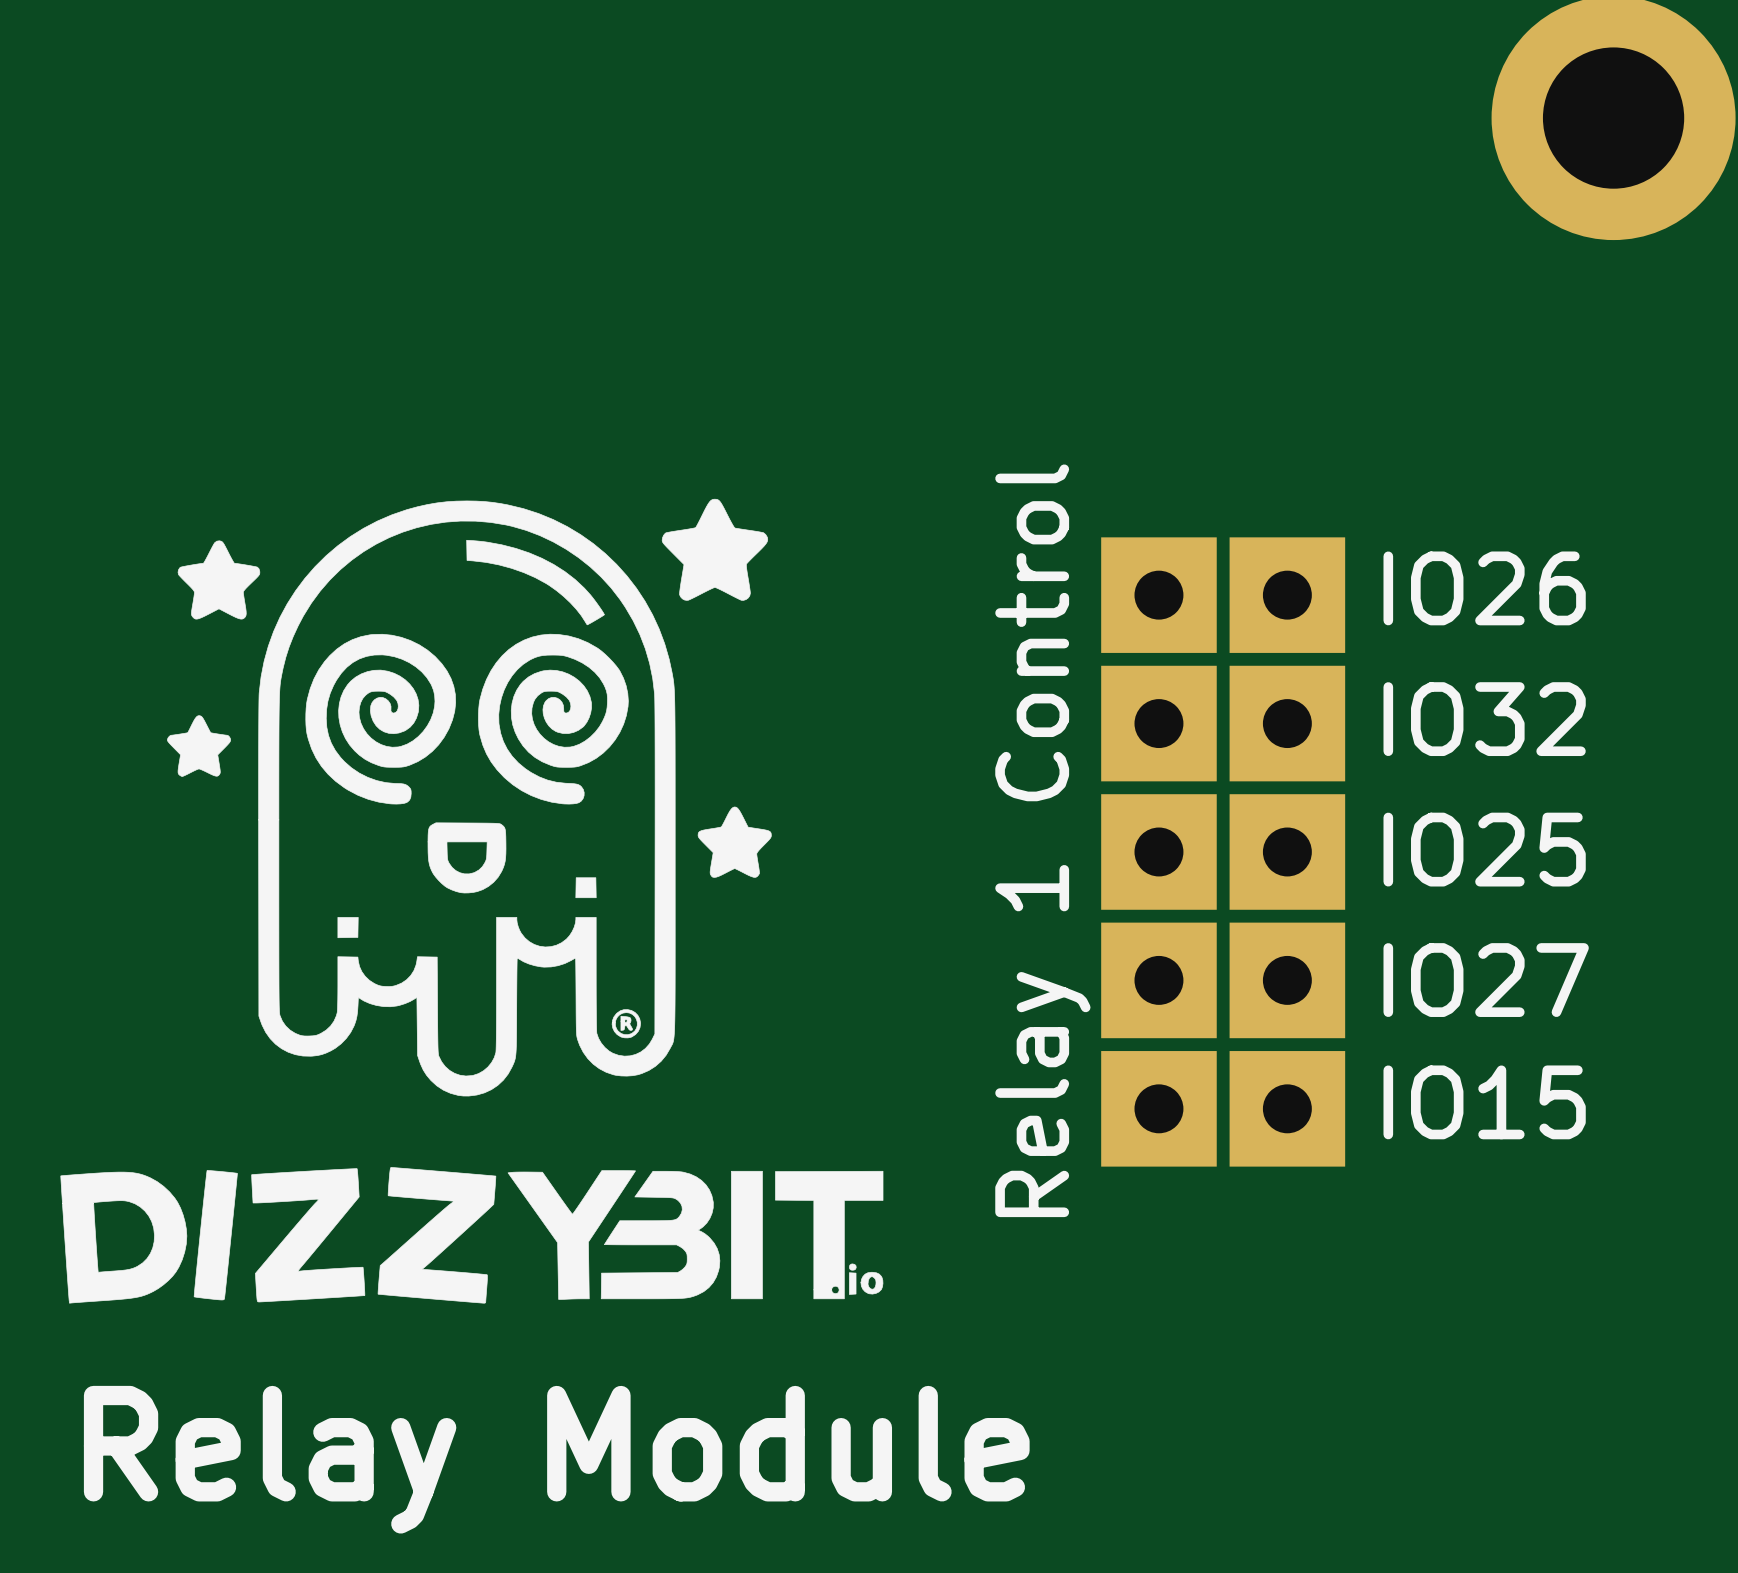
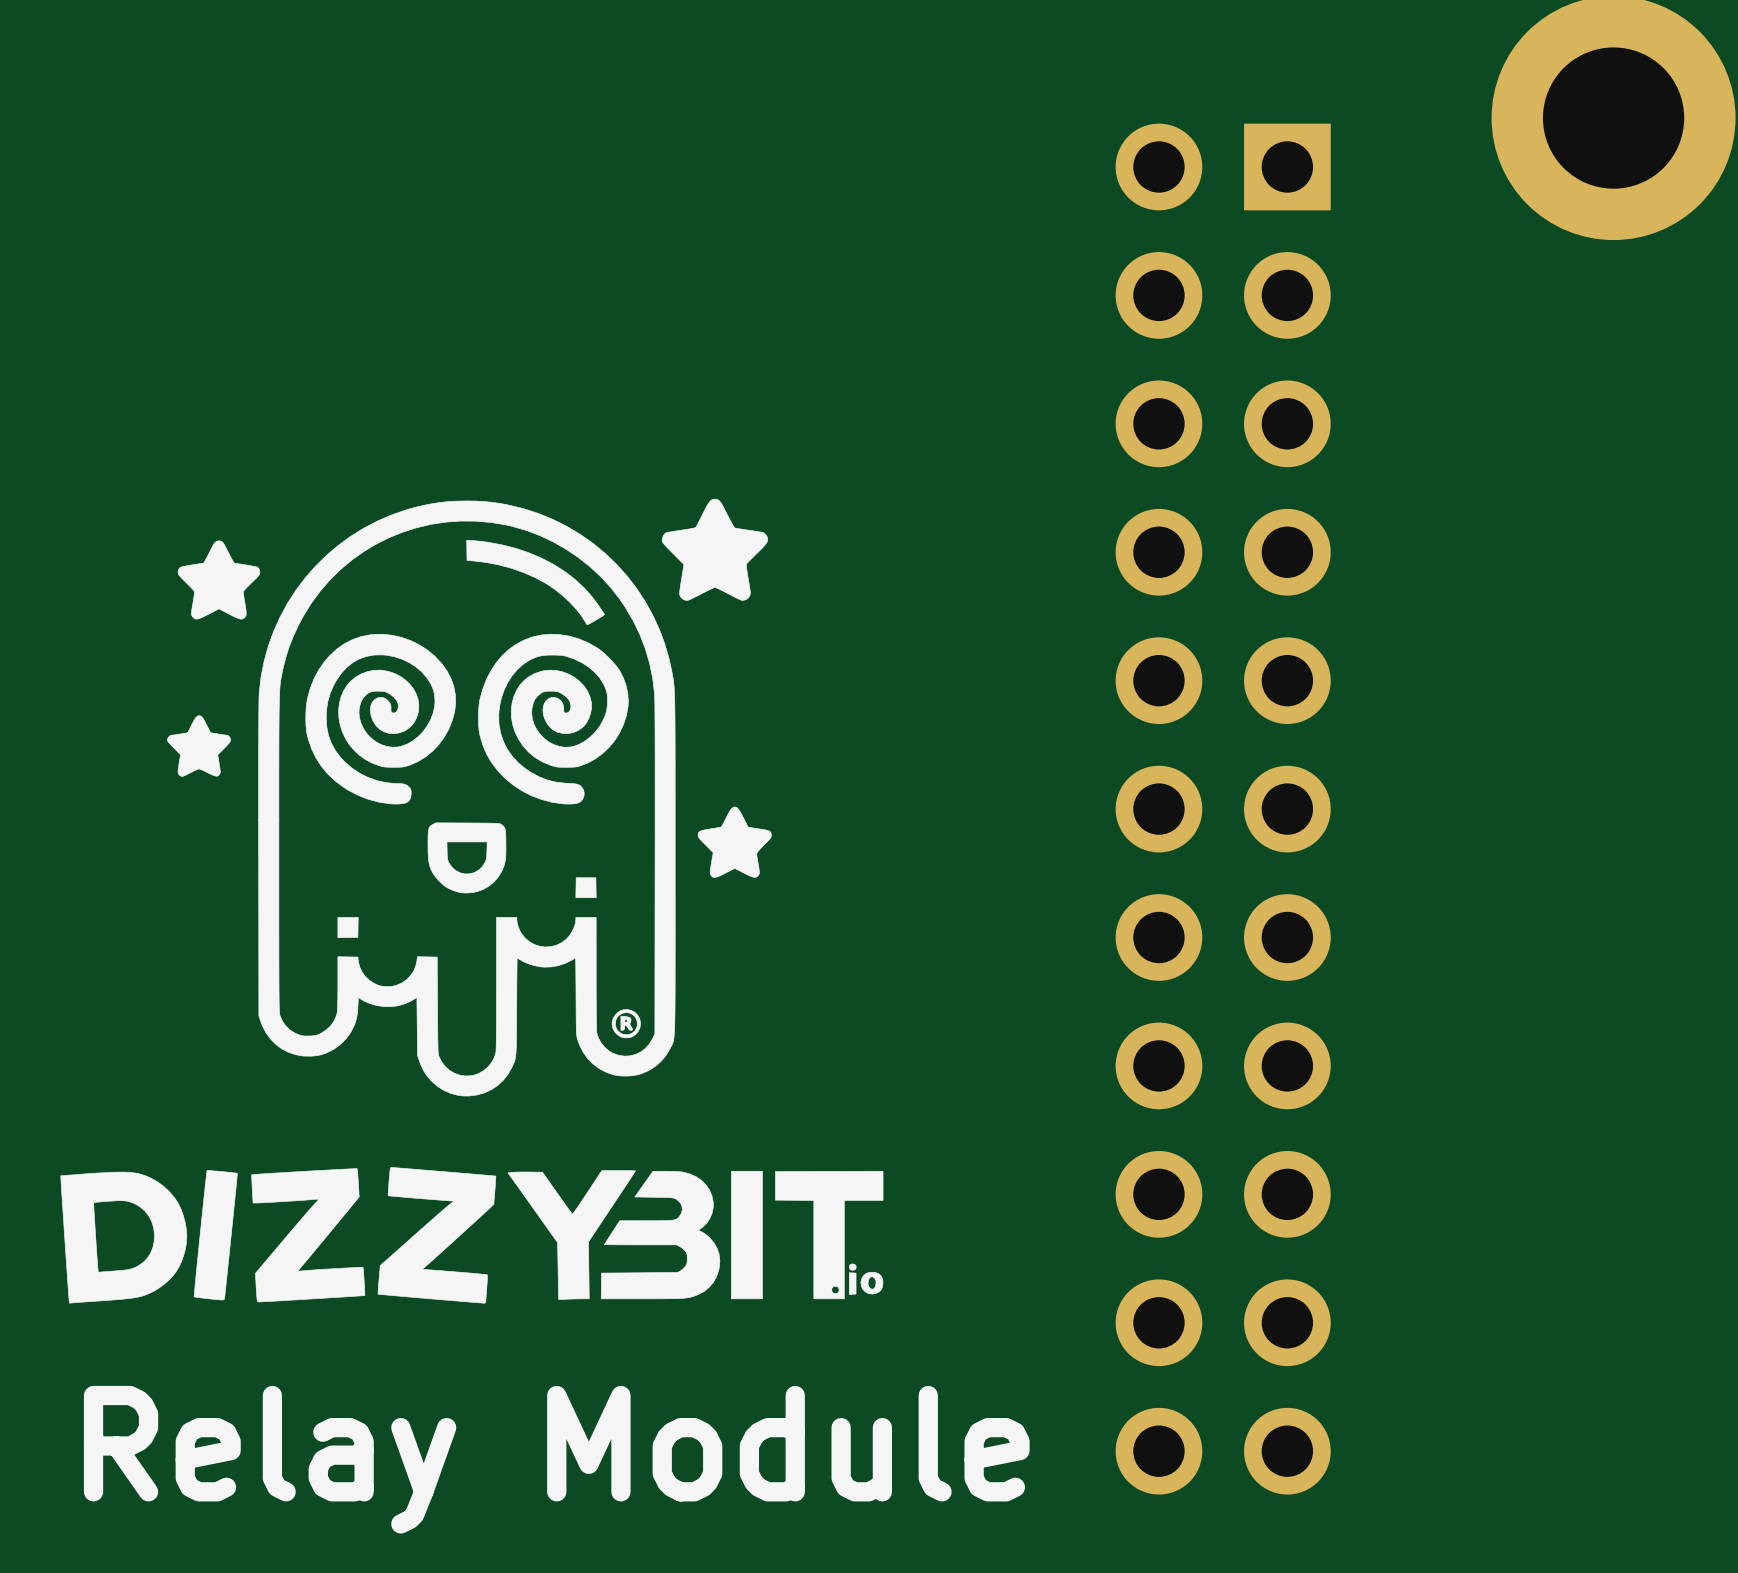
part footprint: [1101, 537, 1346, 1167] -> [1115, 123, 1331, 1495]
text: IO26 (1484, 588) -> none
text: IO32 (1484, 719) -> none
text: Relay 1 Control (1042, 840) -> none
text: IO25 (1484, 849) -> none
text: IO27 (1486, 980) -> none
text: IO15 (1484, 1102) -> none

